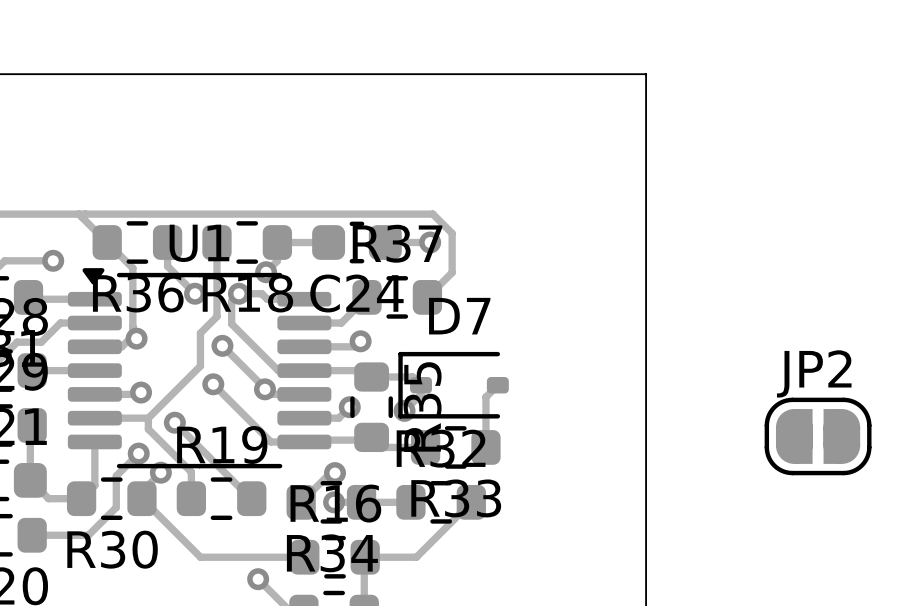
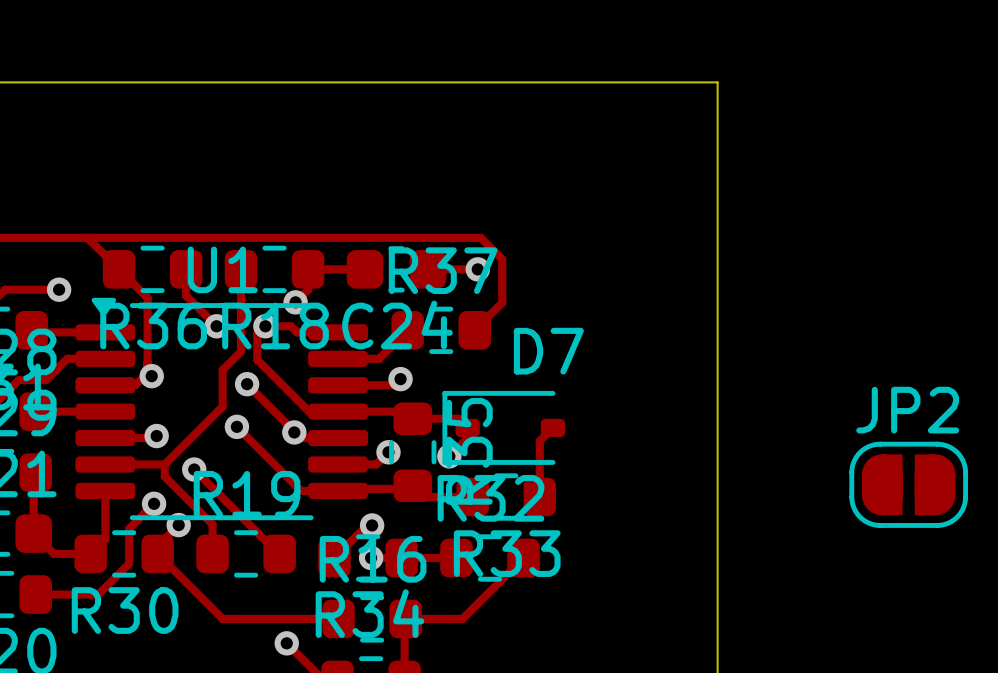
D7 name position: D7 (459, 316) -> D7 (548, 351)

